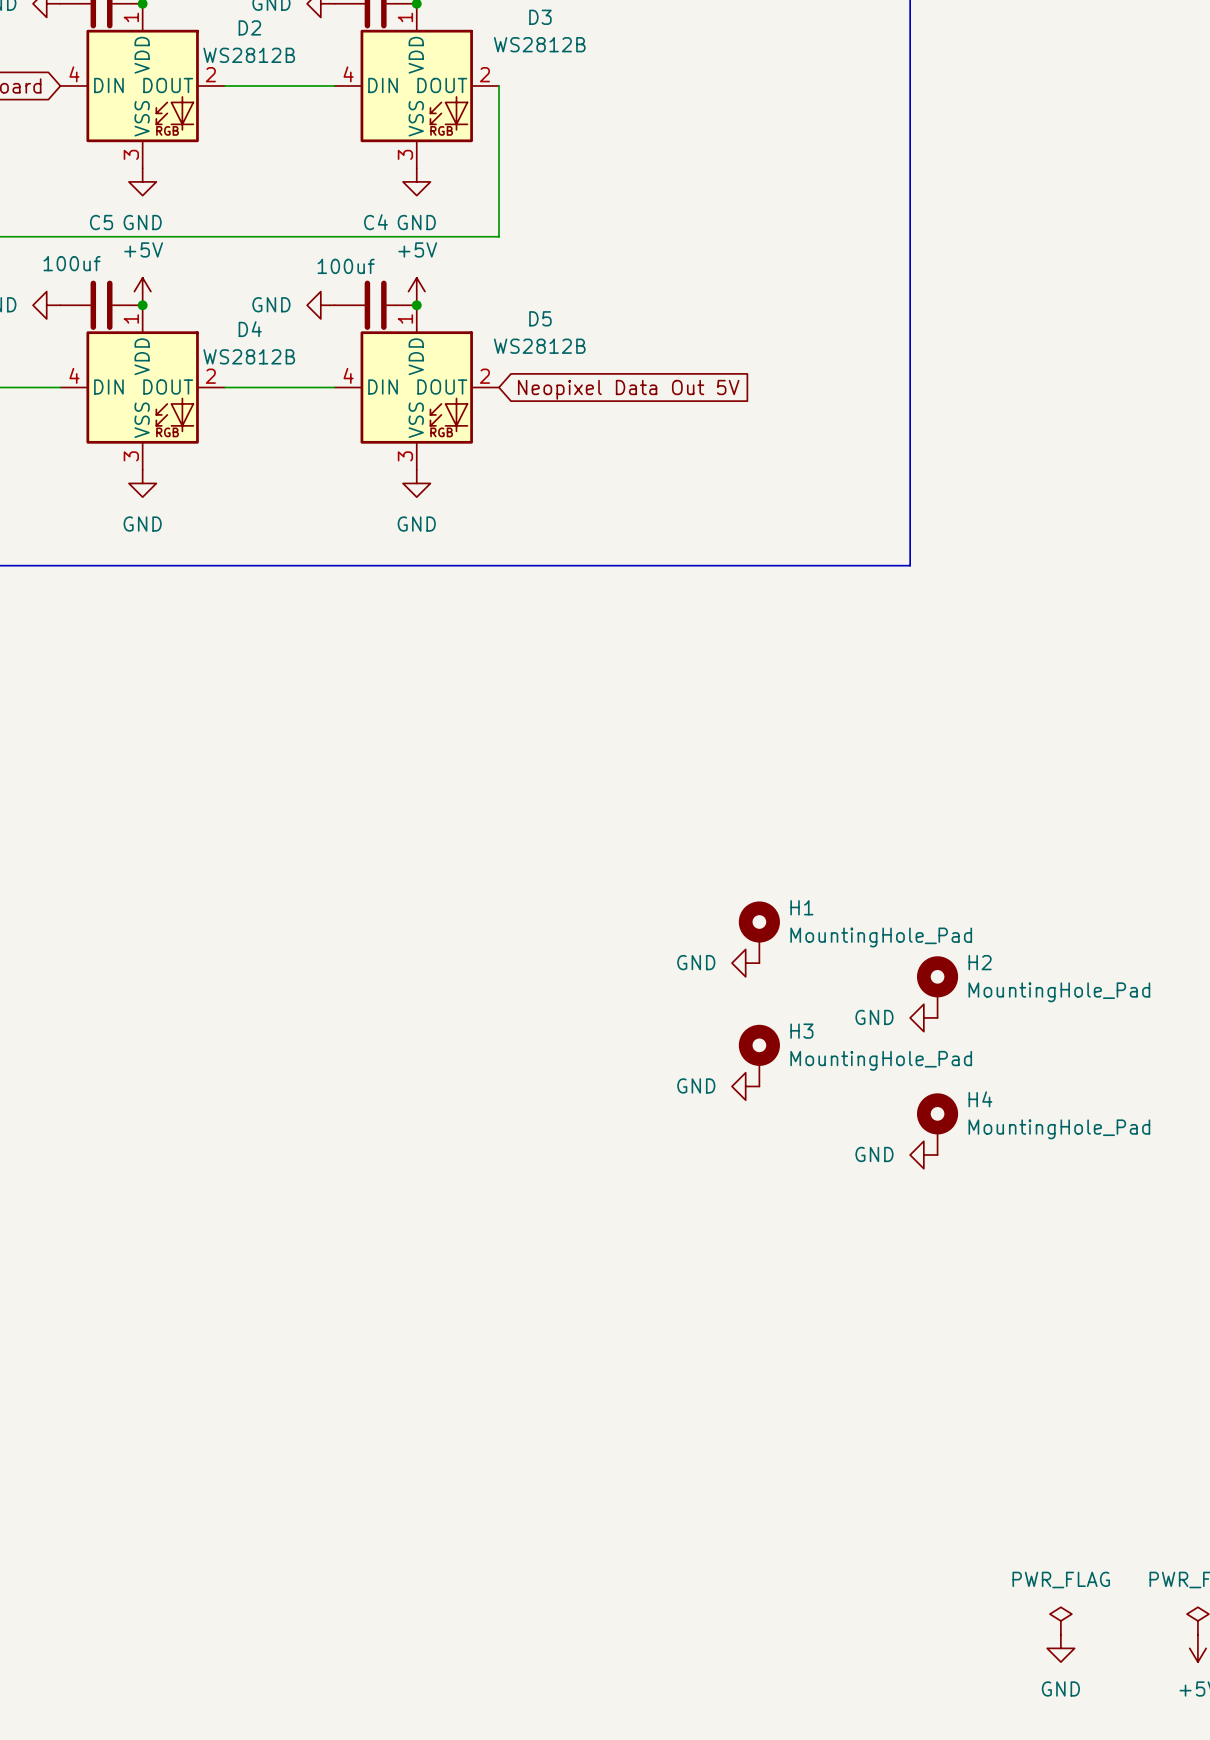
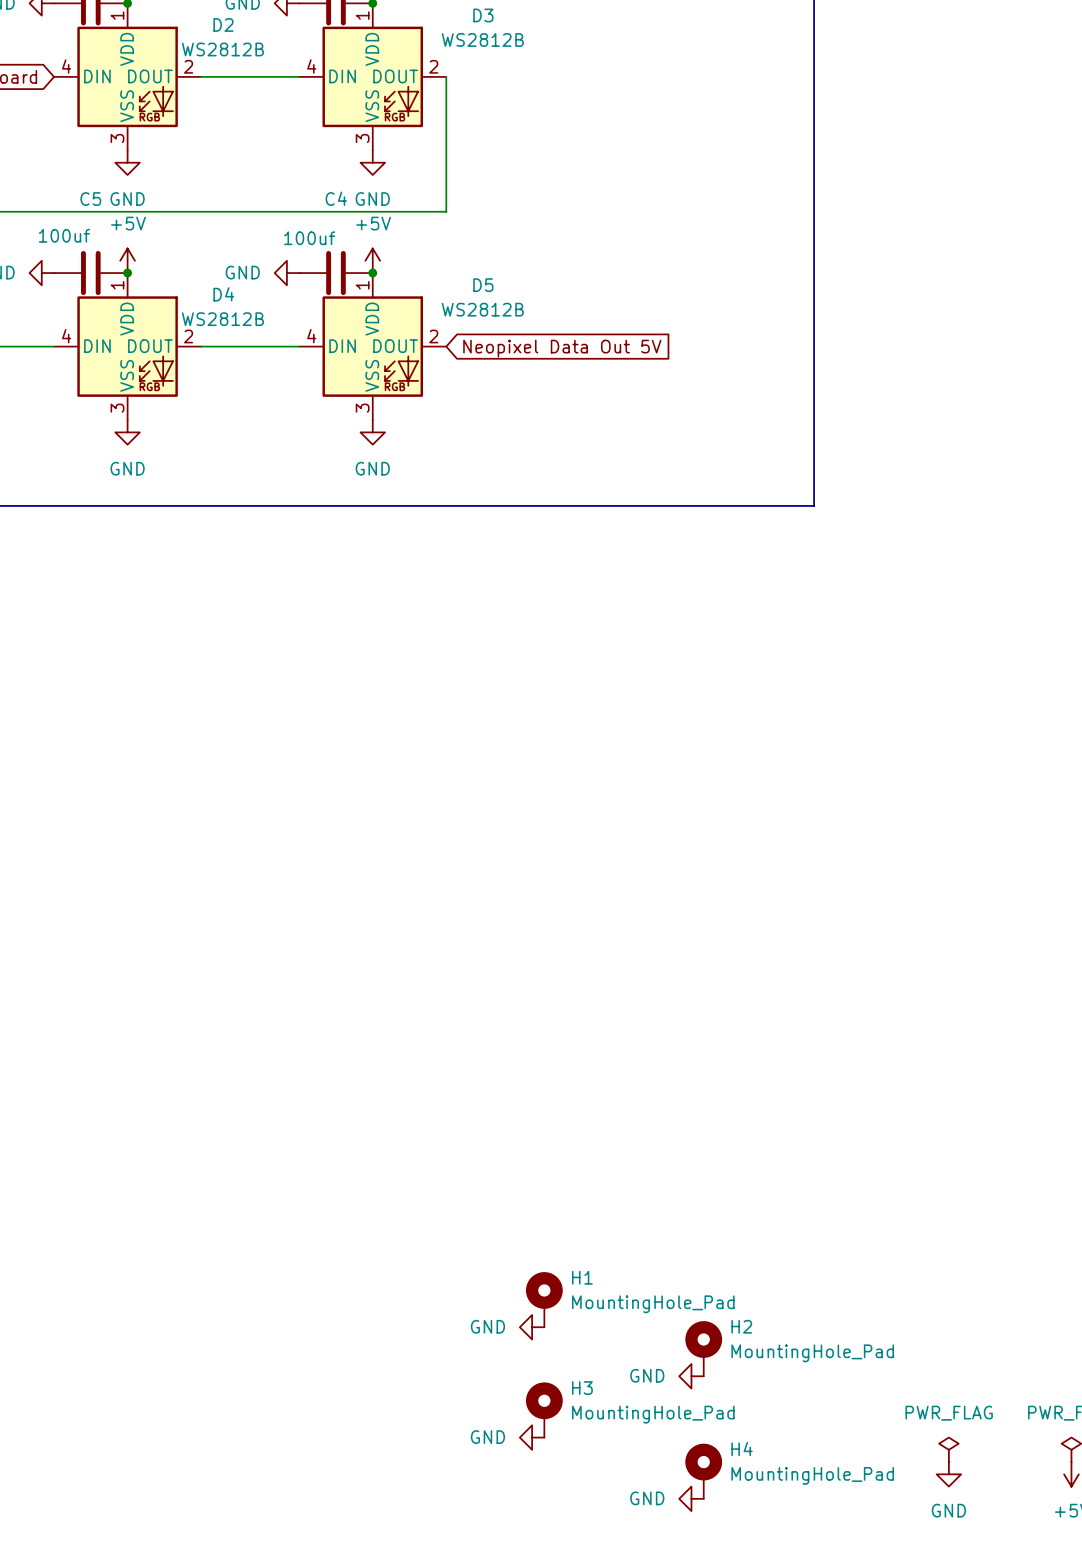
H1 position: (759, 932) -> (544, 1299)
power symbol: GND (745, 963) -> none
H2 position: (937, 987) -> (703, 1348)
power symbol: GND (923, 1017) -> none
H3 position: (759, 1055) -> (544, 1409)
power symbol: GND (745, 1086) -> none
H4 position: (937, 1124) -> (703, 1471)
power symbol: GND (923, 1154) -> none
power symbol: none -> GND (532, 1327)
power symbol: none -> GND (691, 1376)
power symbol: none -> GND (532, 1437)
power symbol: none -> GND (691, 1498)

